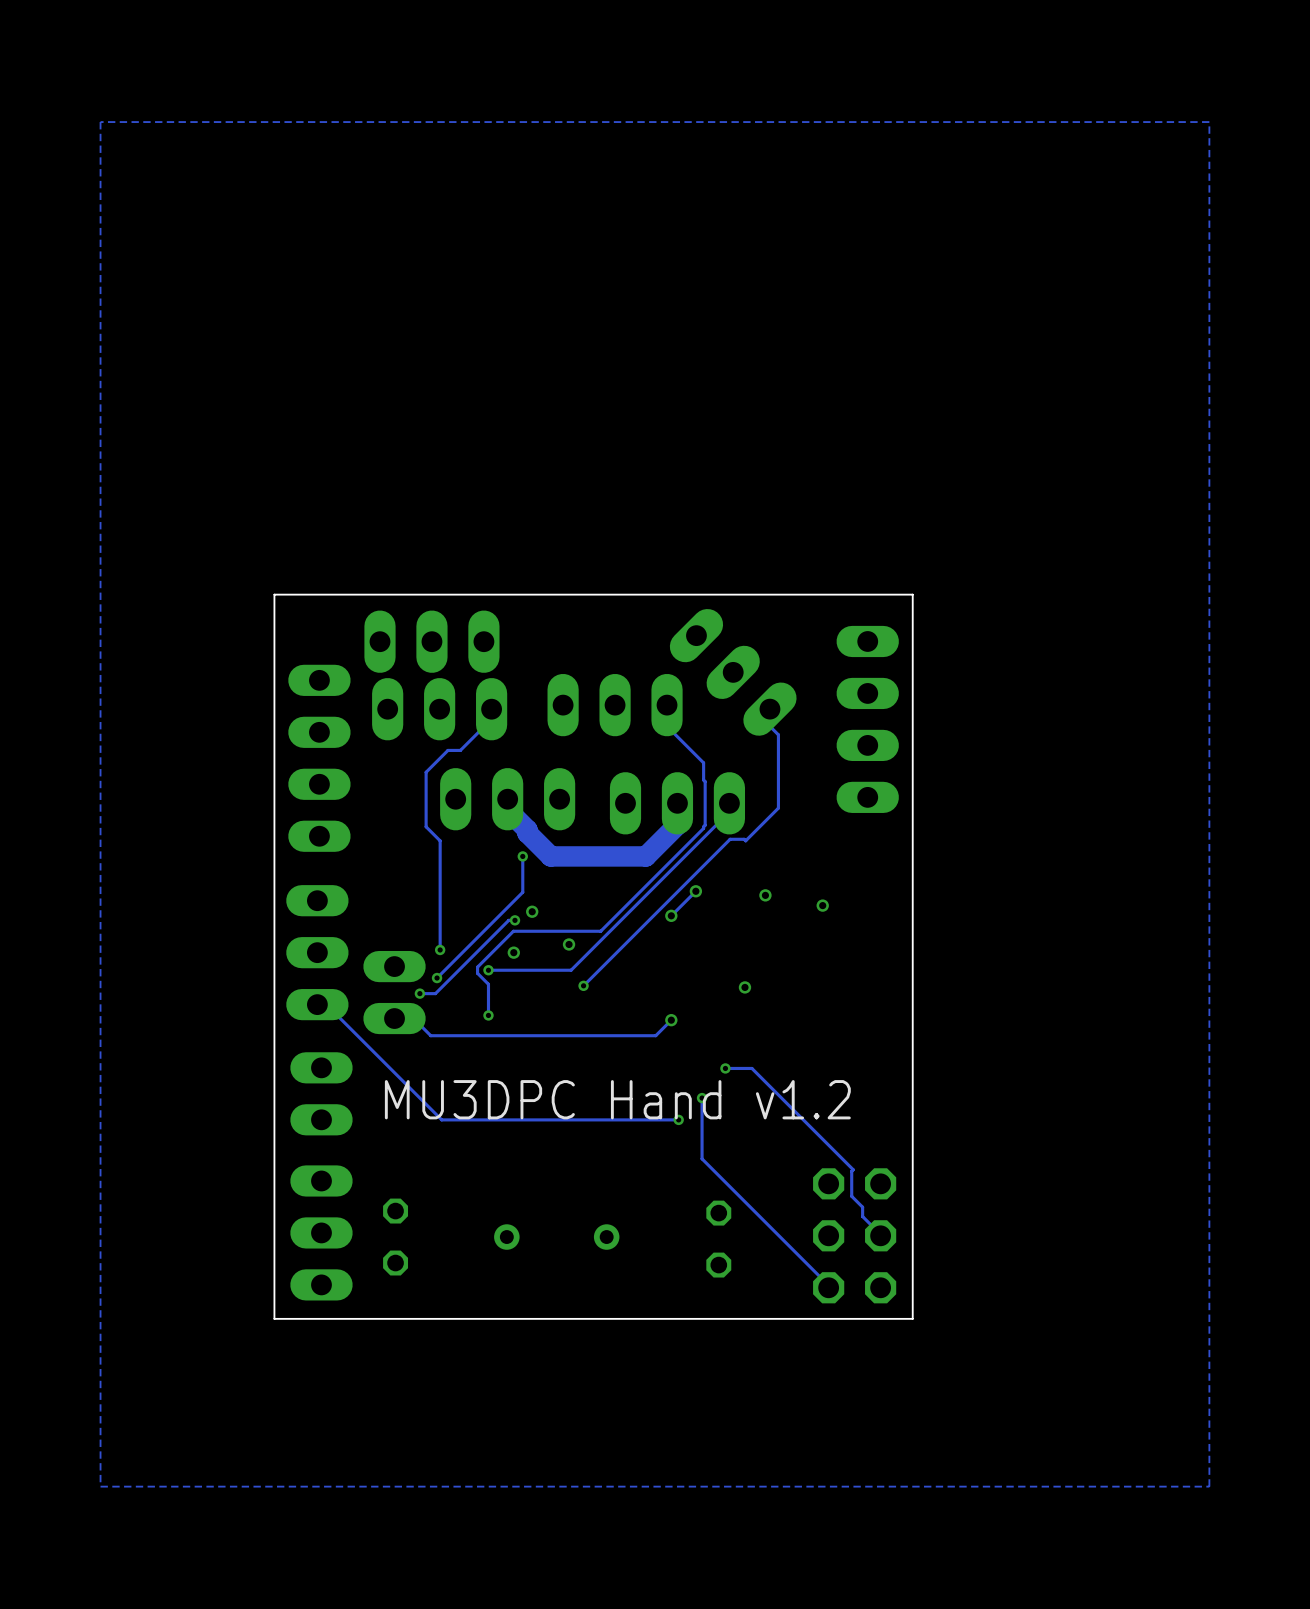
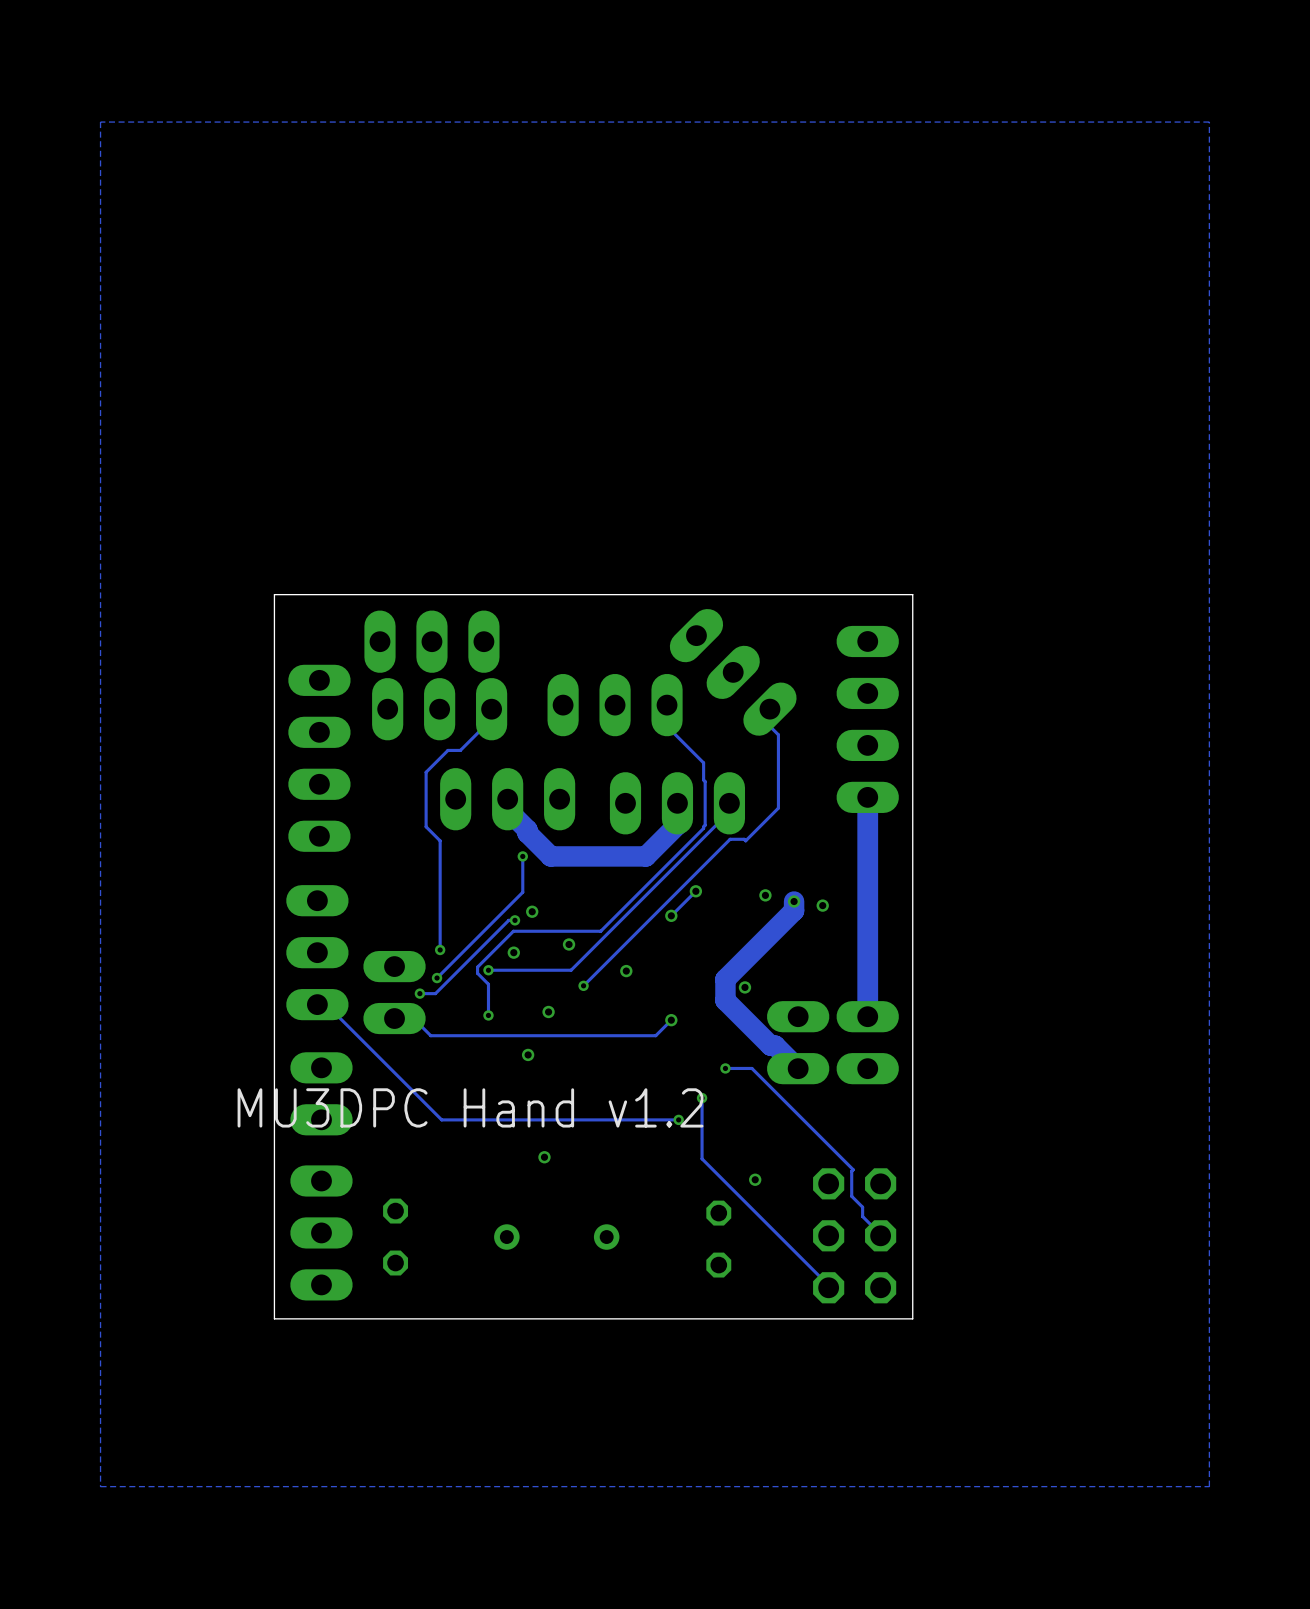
track: none -> (867, 797) (867, 1016)
track: none -> (794, 901) (794, 910) (725, 979) (725, 1000) (770, 1045) (775, 1045) (798, 1068)
via: none -> (794, 901)
via: none -> (626, 971)
via: none -> (548, 1011)
part: none -> (798, 1042)
part: none -> (867, 1042)
via: none -> (528, 1054)
text position: MU3DPC Hand v1.2 (617, 1099) -> MU3DPC Hand v1.2 (470, 1107)
via: none -> (544, 1157)
via: none -> (755, 1179)

